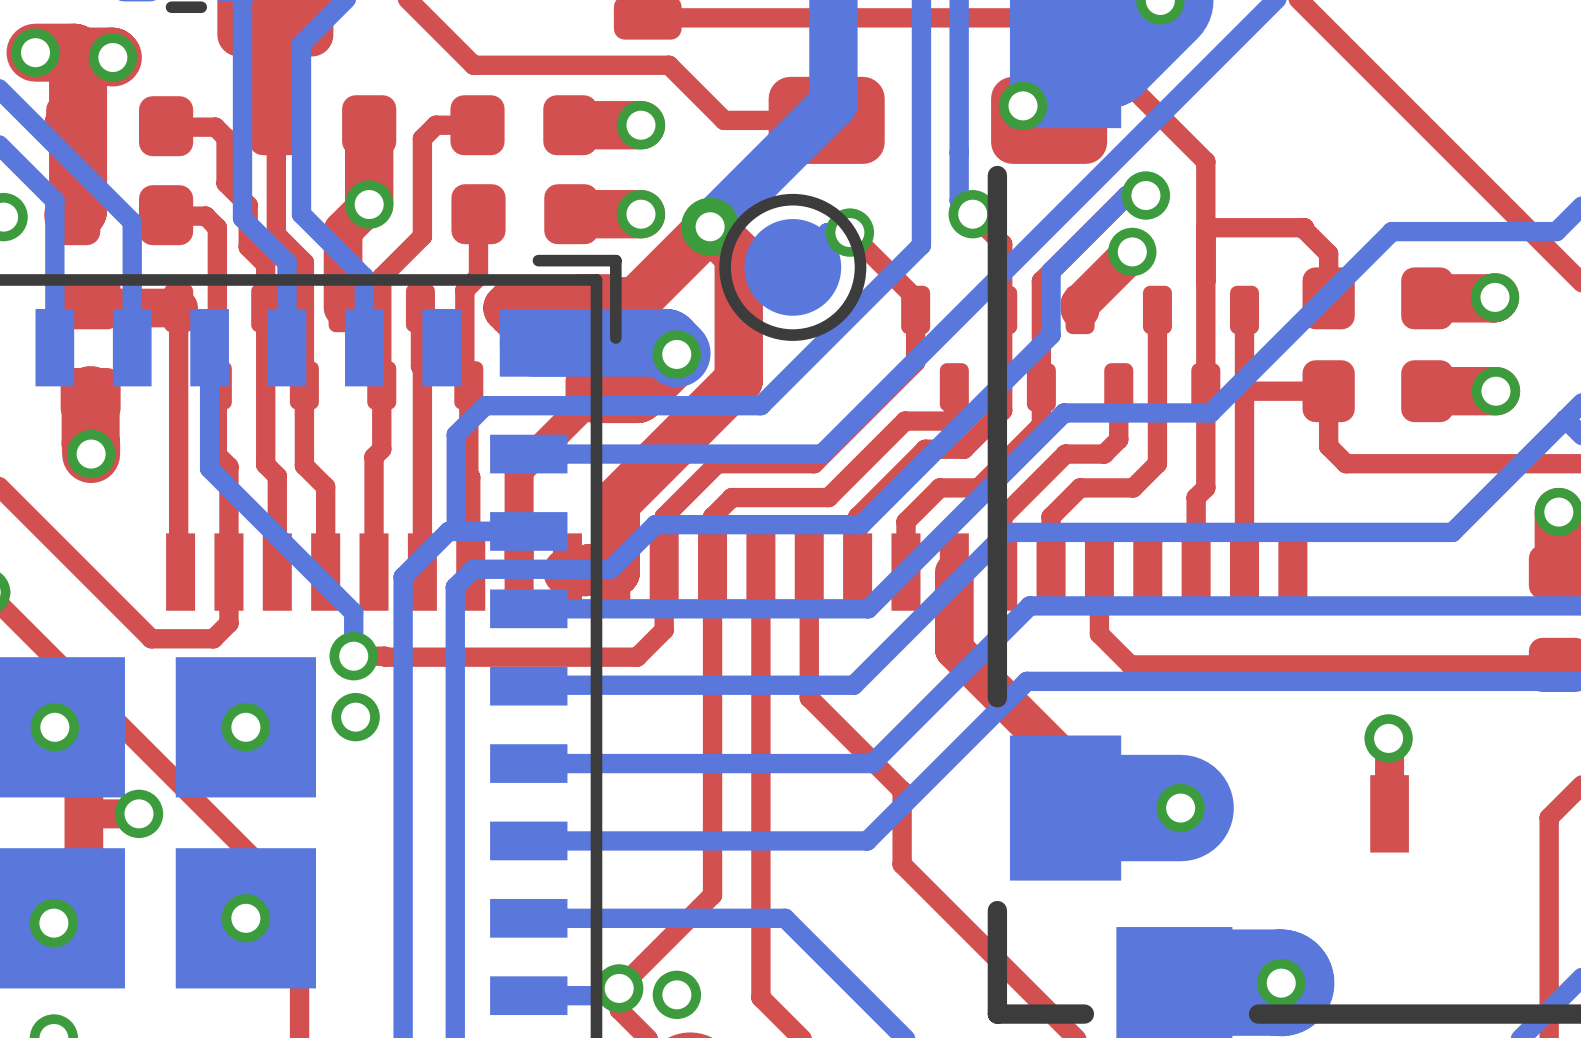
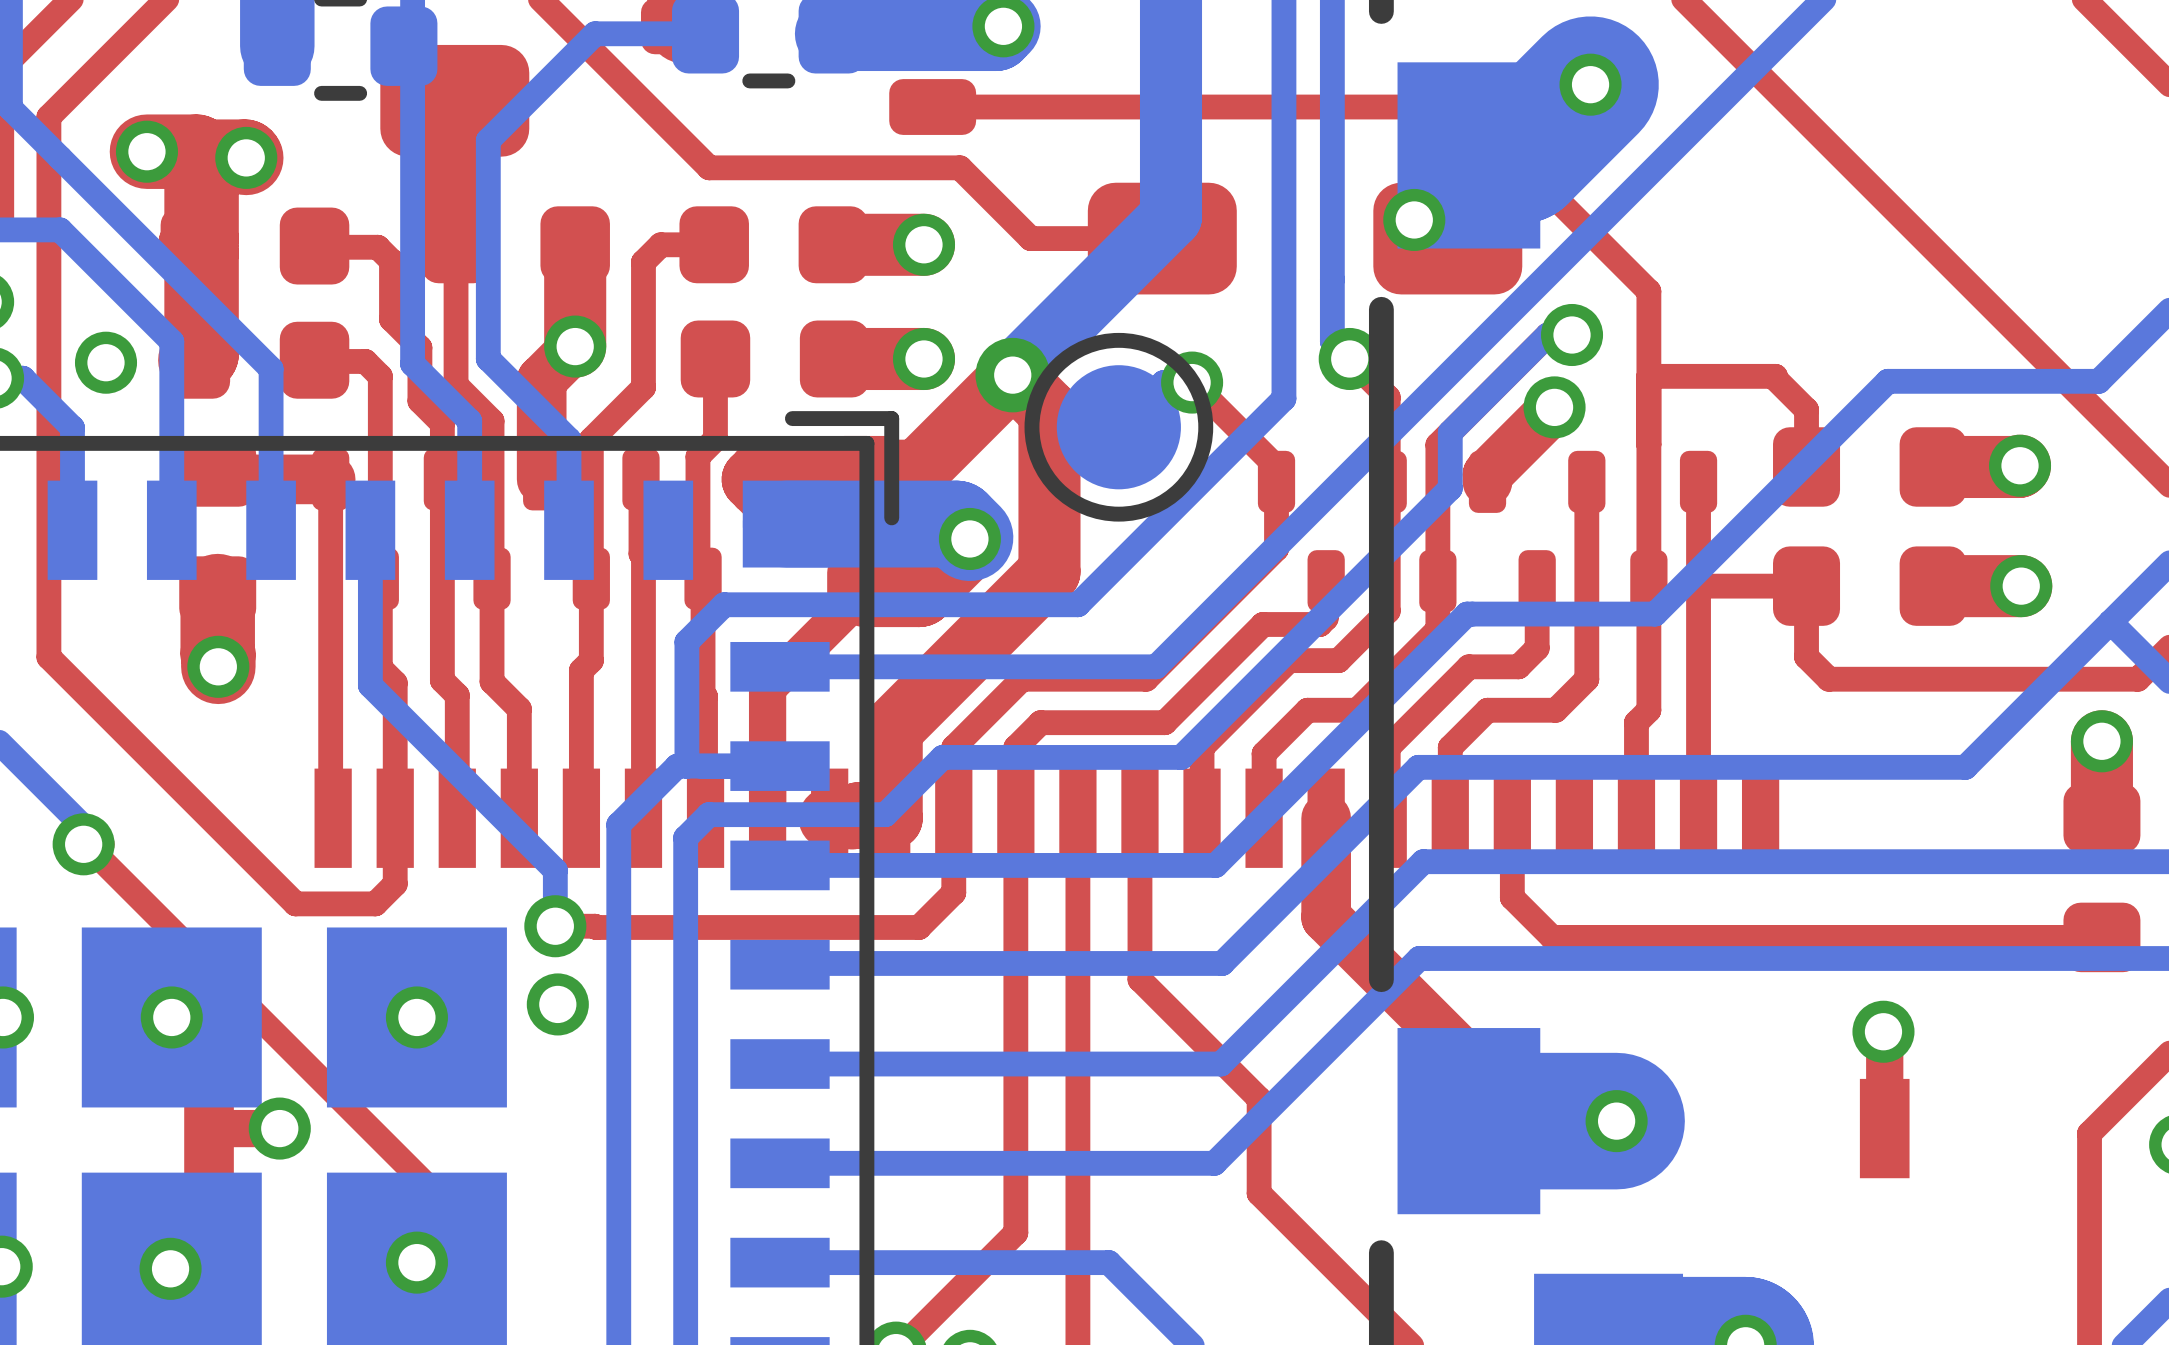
bottom track: (1051, 315) (1051, 335) (861, 524) (841, 524) -> (1450, 488) (1181, 757)
bottom track: (1026, 532) (1006, 532) (853, 685) -> (1418, 767) (1222, 963) (1197, 963)

